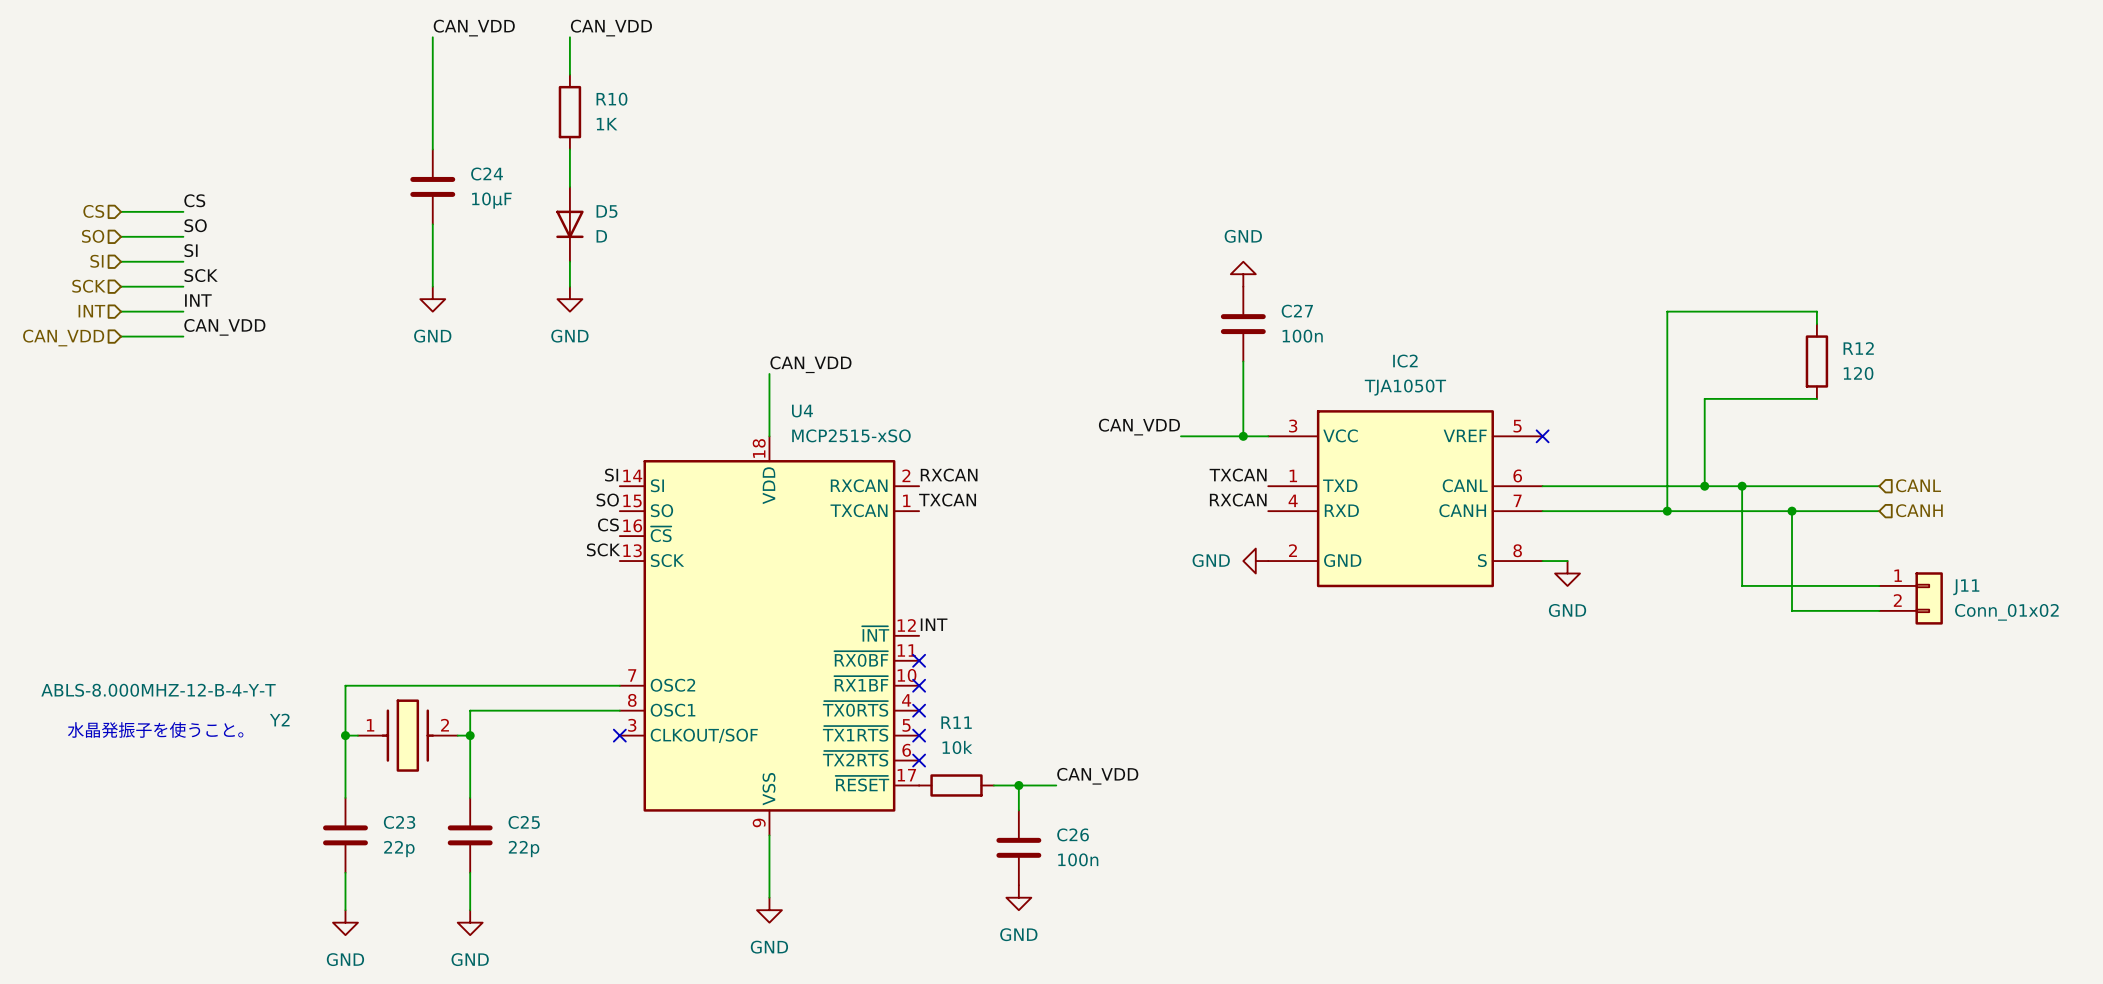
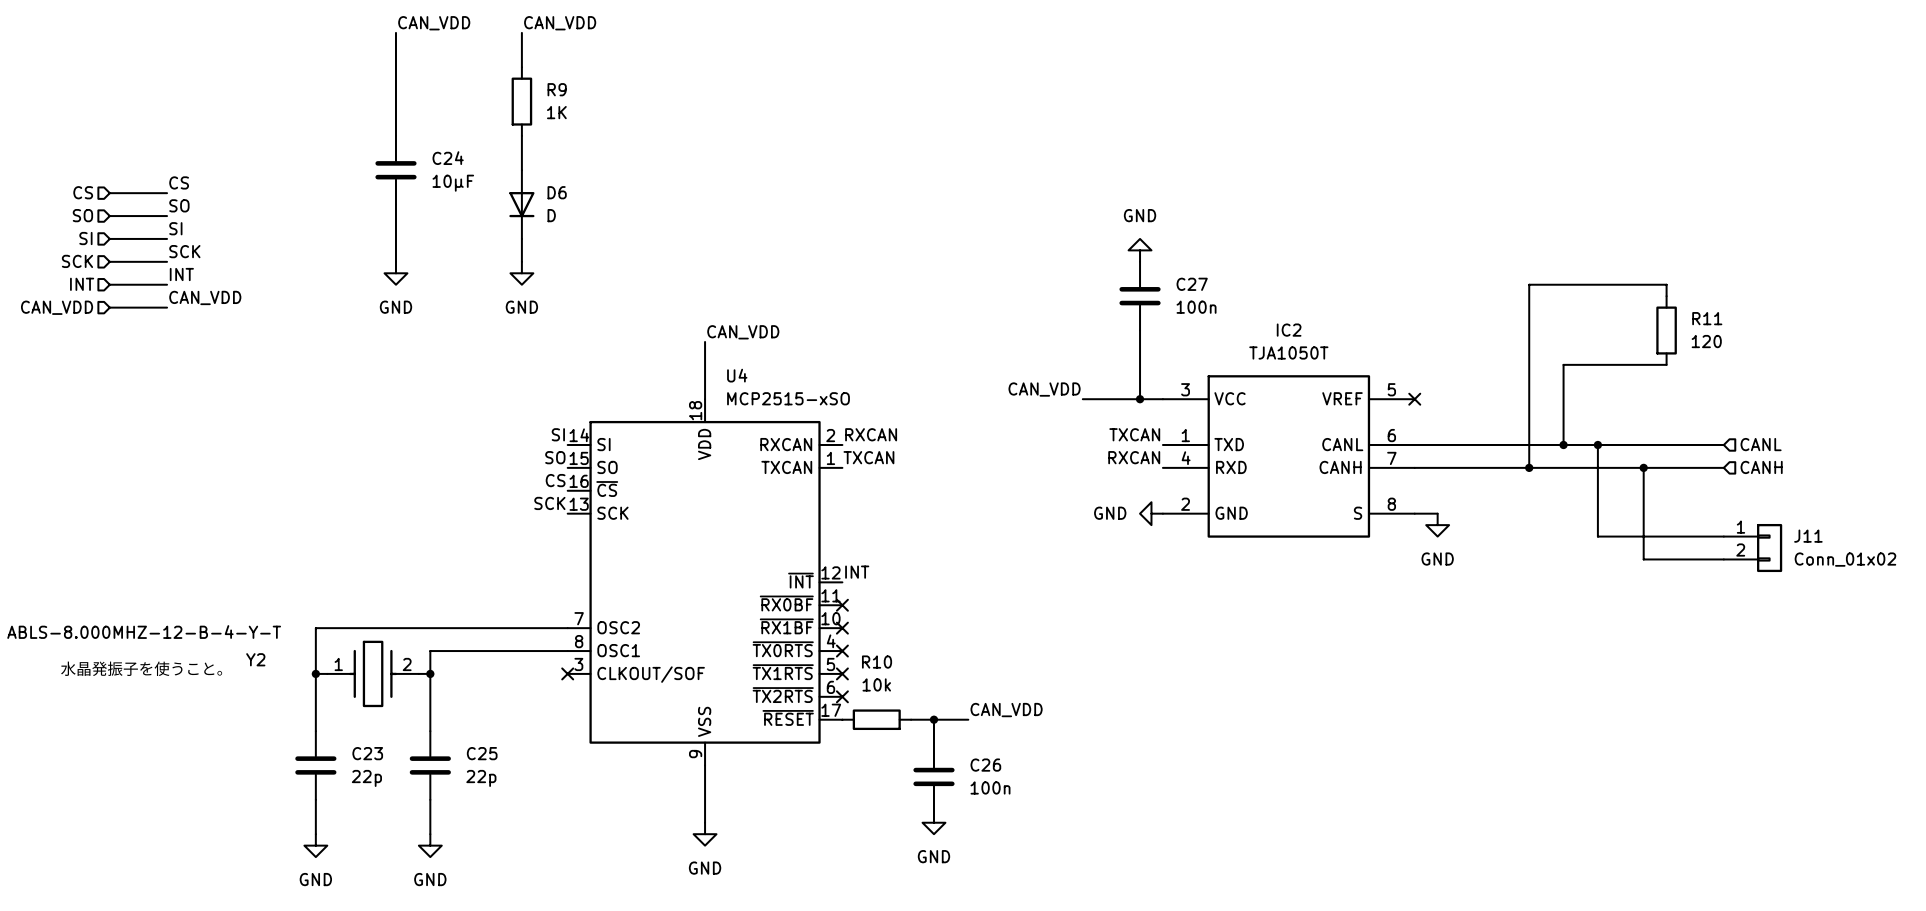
R10 name: R10 (611, 99) -> R9 (557, 89)
D5 name: D5 (607, 211) -> D6 (557, 192)
R12 name: R12 (1858, 348) -> R11 (1707, 318)
R11 name: R11 (956, 722) -> R10 (877, 662)

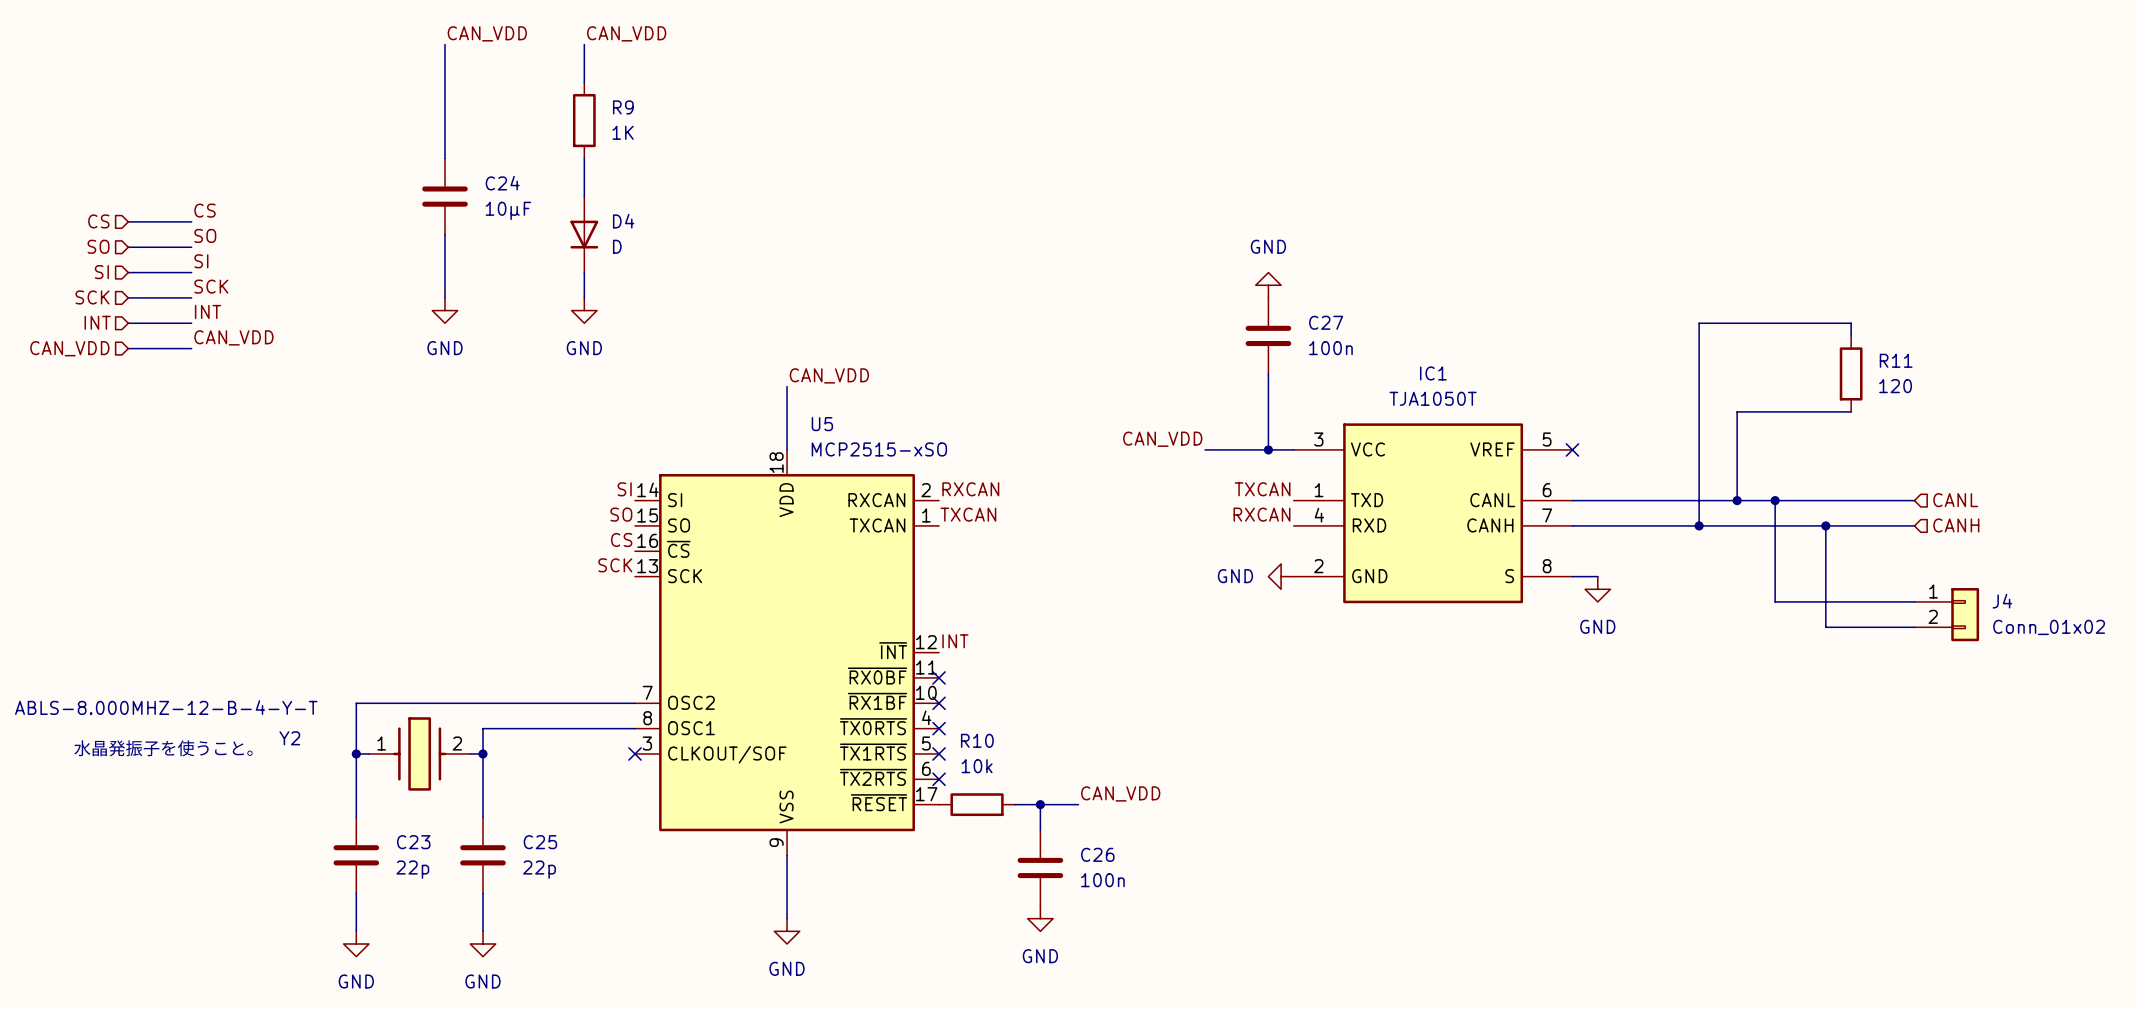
D6 name: D6 (557, 192) -> D4 (623, 221)
IC2 name: IC2 (1289, 330) -> IC1 (1433, 373)
U4 name: U4 (737, 375) -> U5 (822, 424)
J11 name: J11 (1808, 536) -> J4 (2002, 601)

